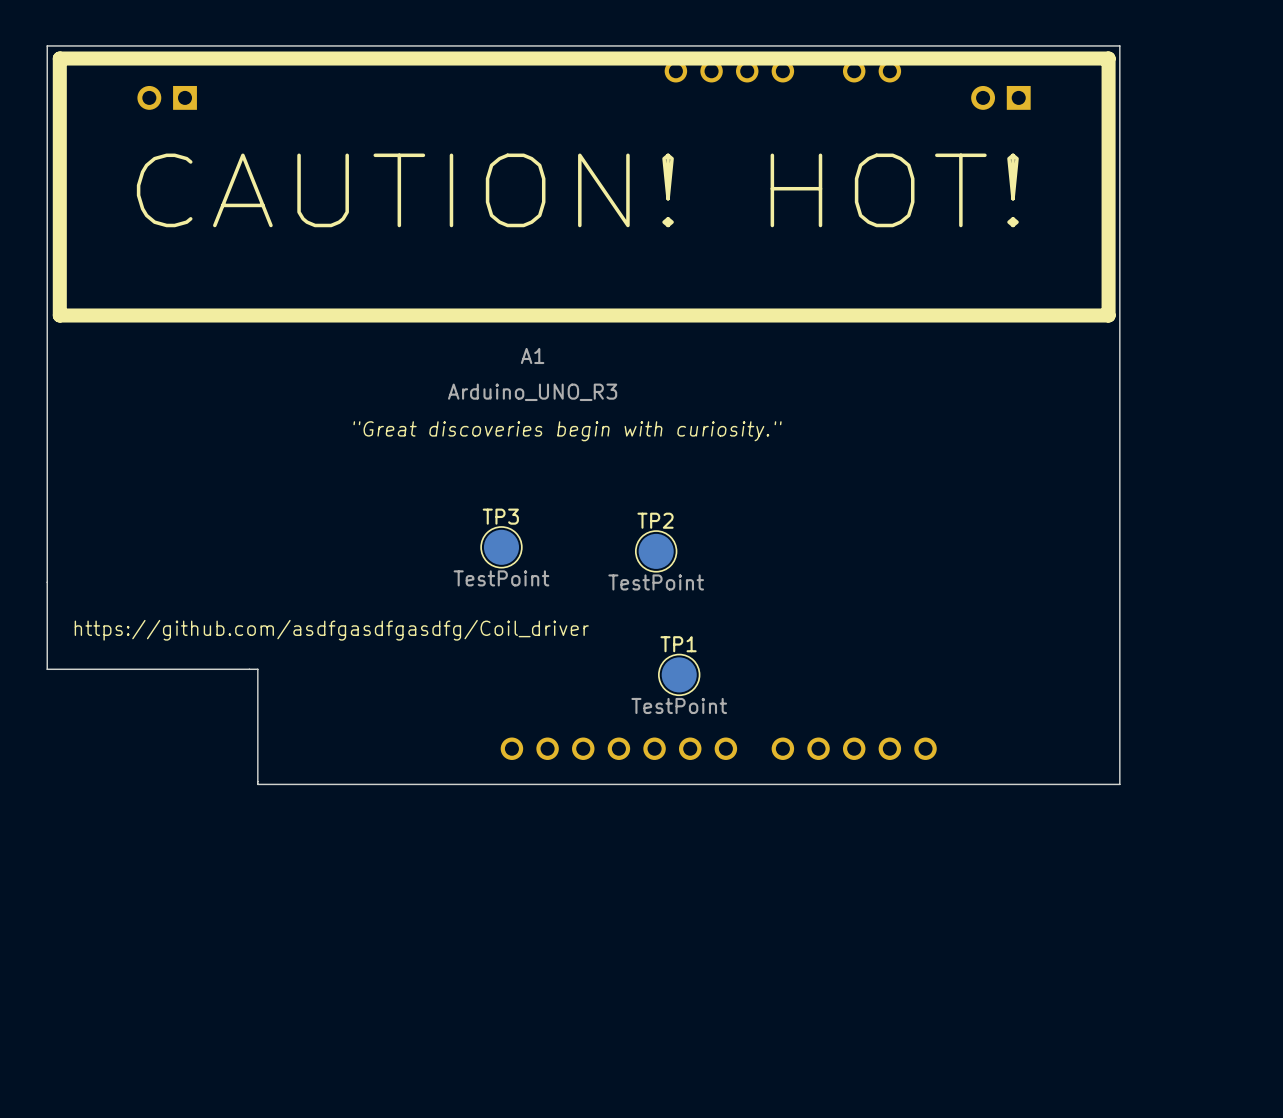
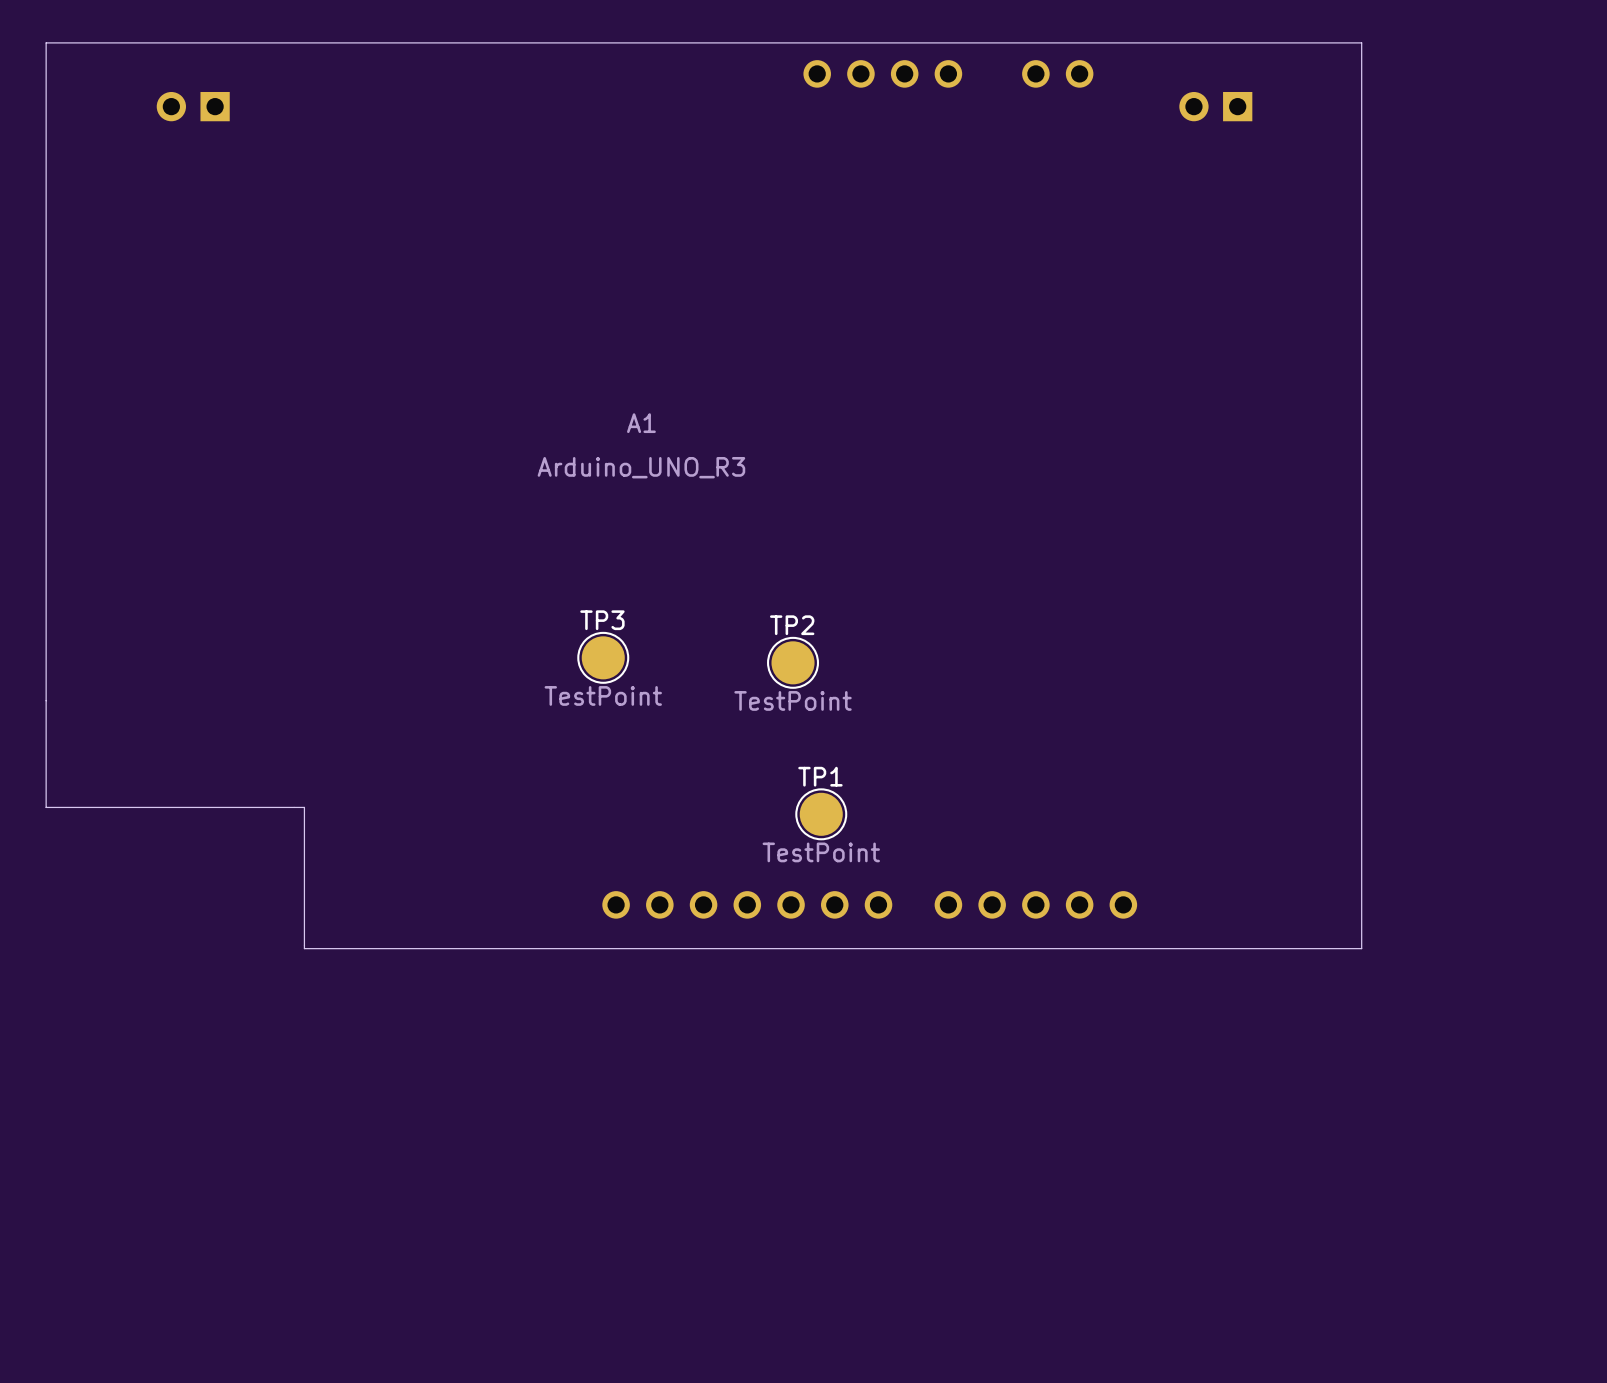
line: (1108, 58) (59, 58) (59, 315) (1108, 315) (1108, 58) -> none
text: CAUTION! HOT! (577, 190) -> none
text: "Great discoveries begin with curiosity." (567, 431) -> none
text: https://github.com/asdfgasdfgasdfg/Coil_driver (331, 630) -> none

